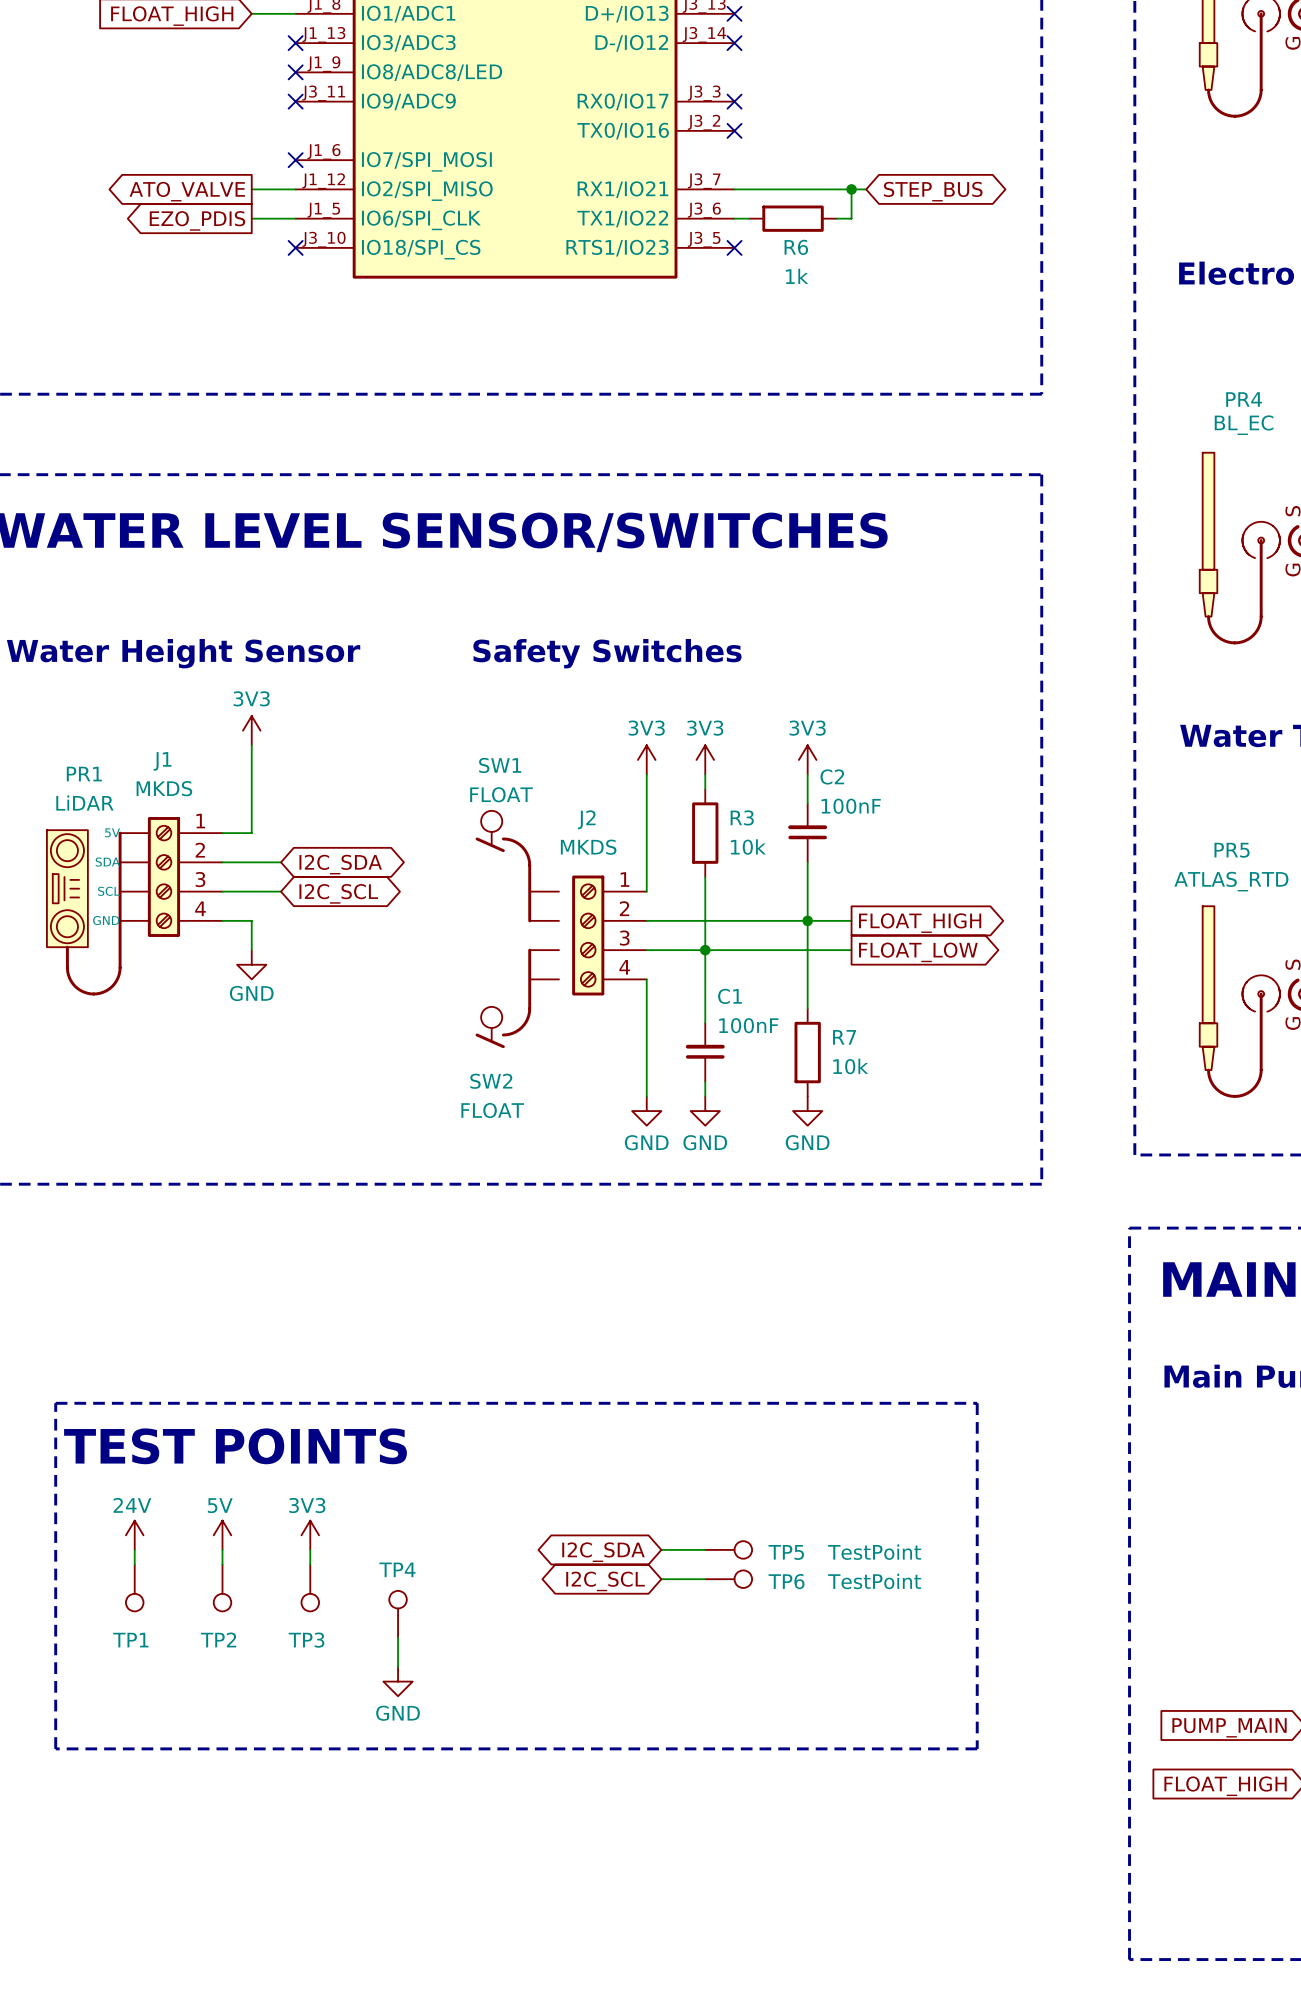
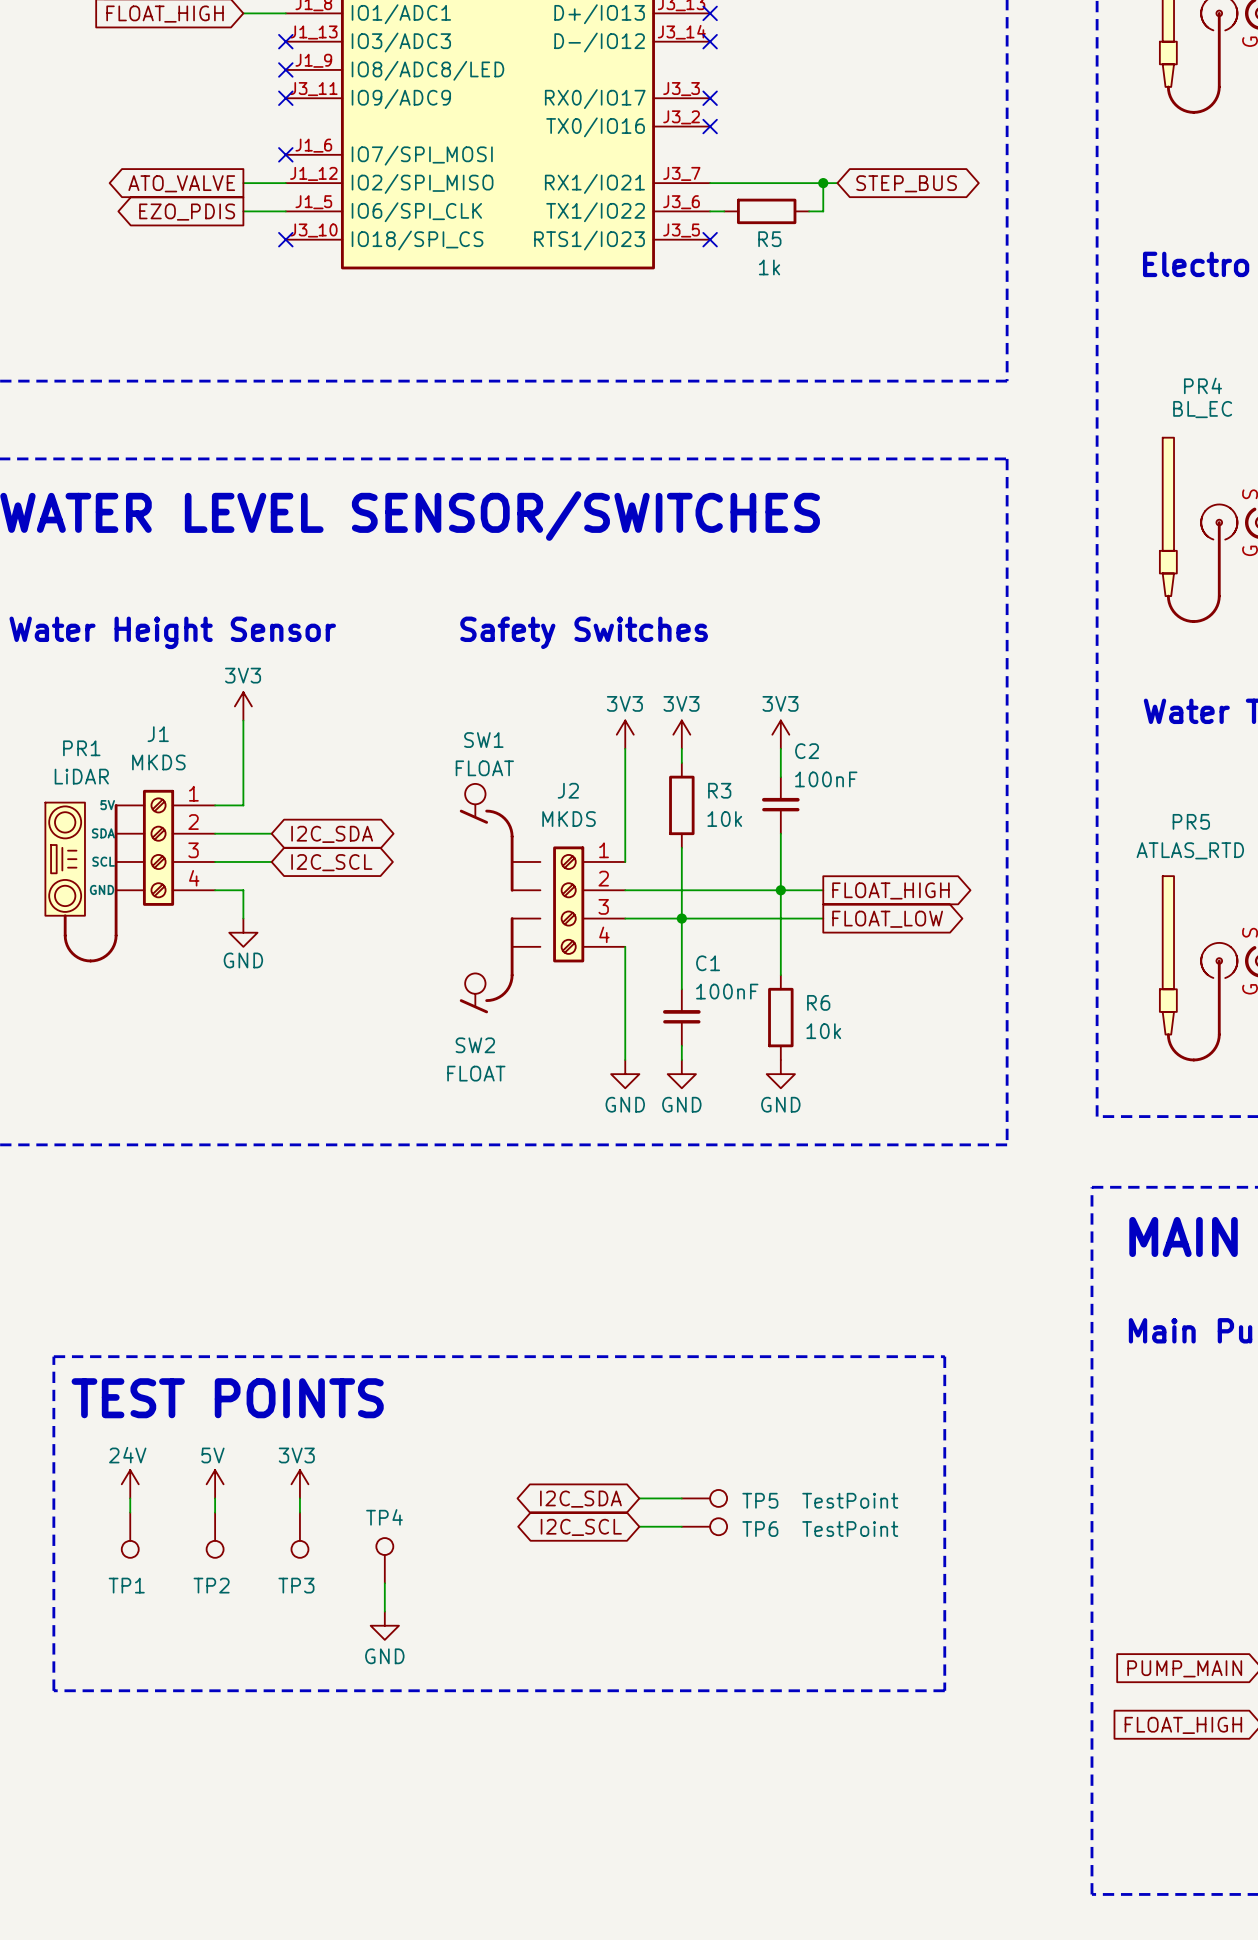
R6 name: R6 (796, 247) -> R5 (769, 239)
R7 name: R7 (844, 1037) -> R6 (818, 1002)

